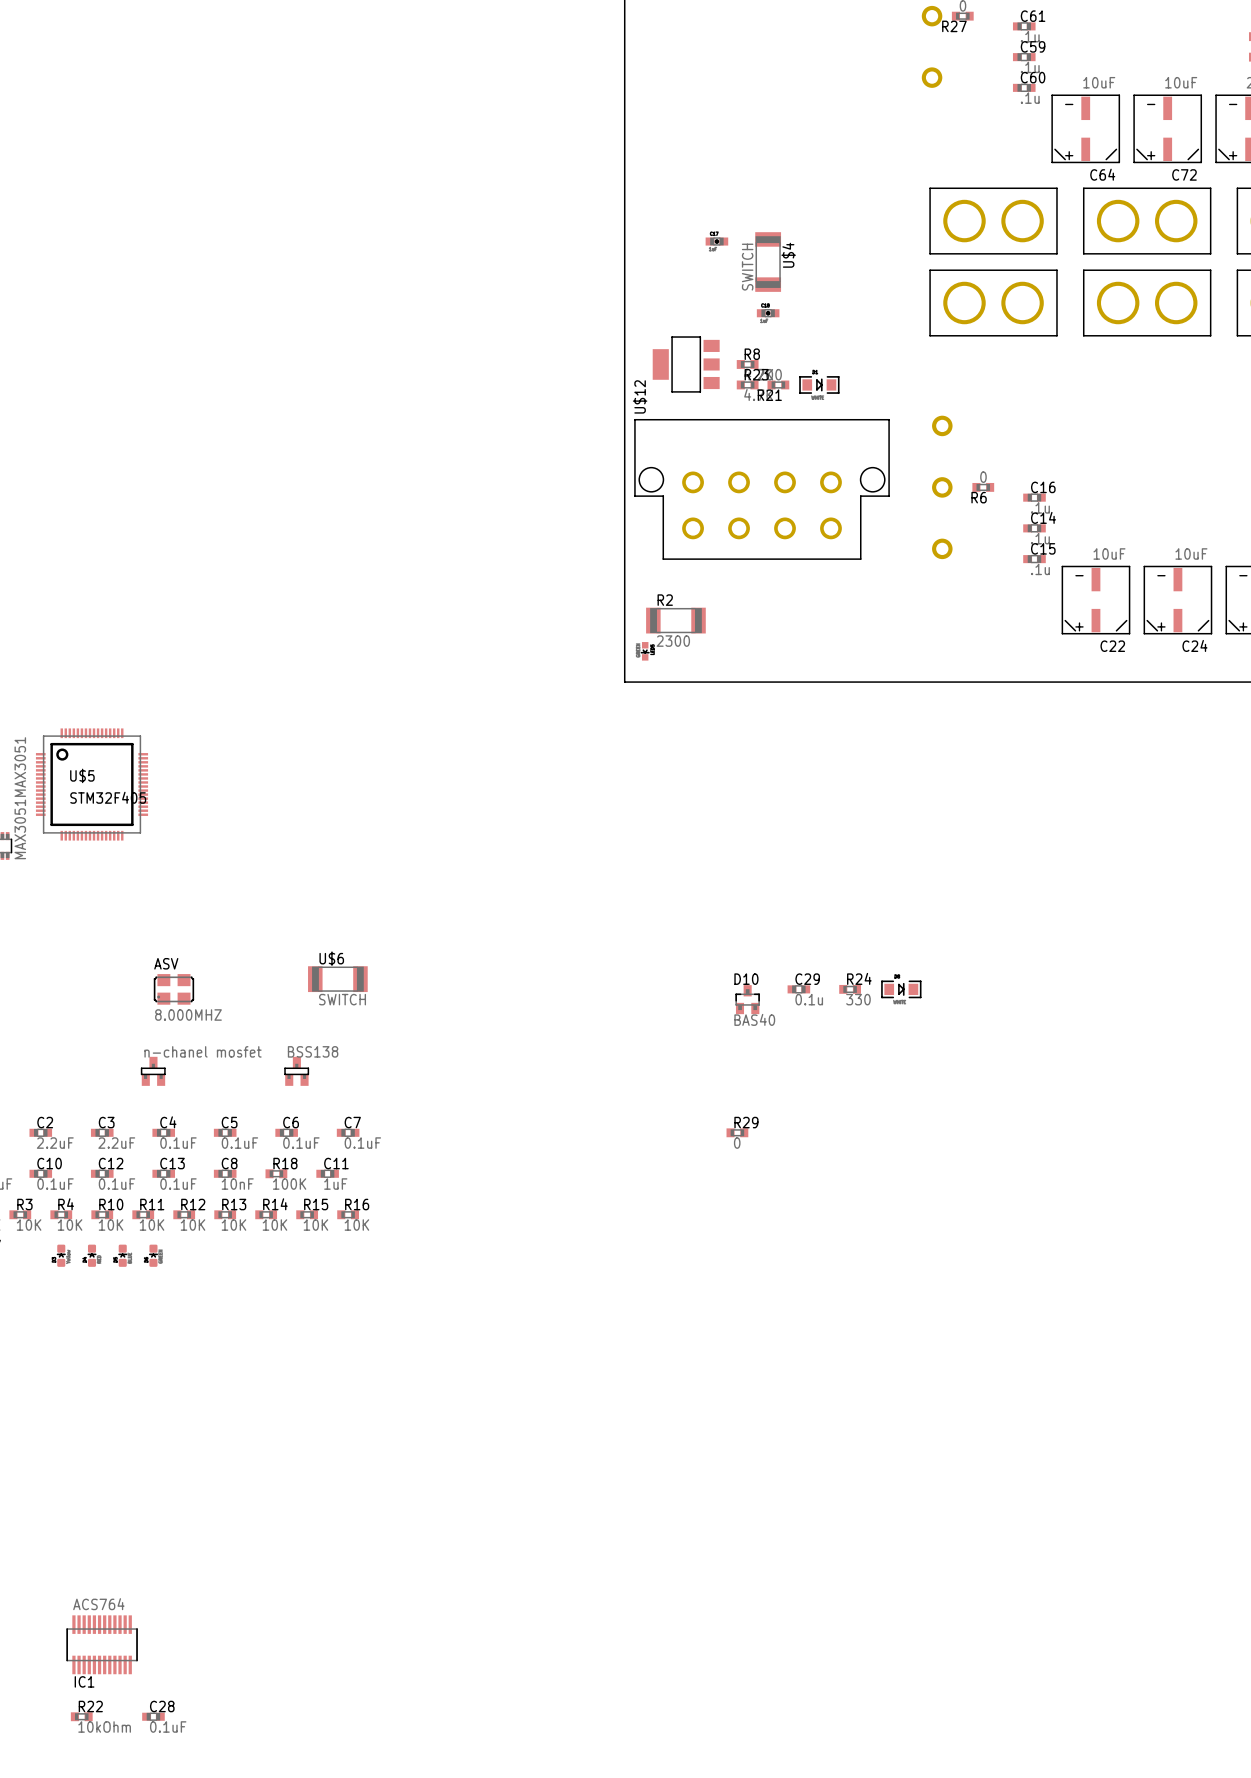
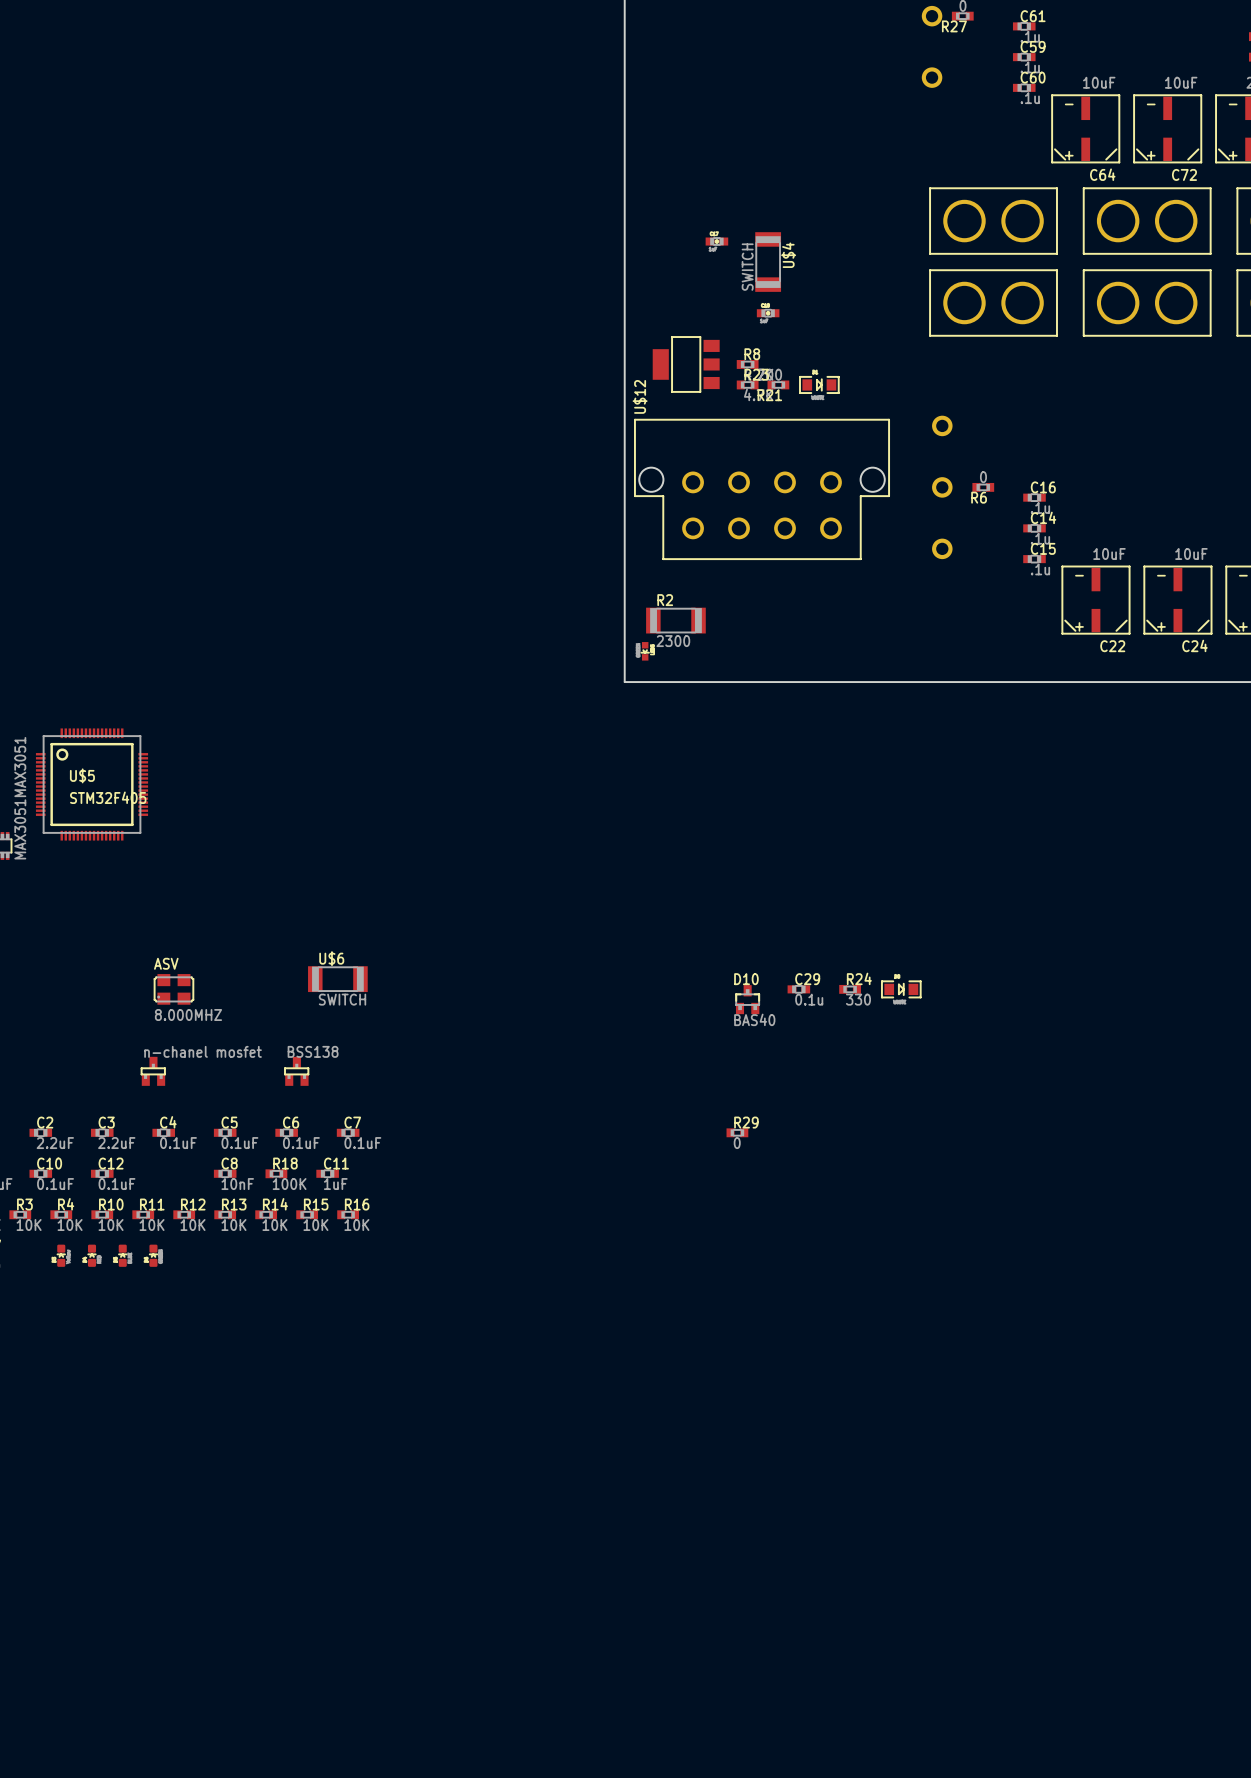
C13: 0.1uF (163, 1173) -> none
IC1: ACS764 (102, 1644) -> none
R22: 10kOhm (81, 1716) -> none
C28: 0.1uF (153, 1716) -> none

